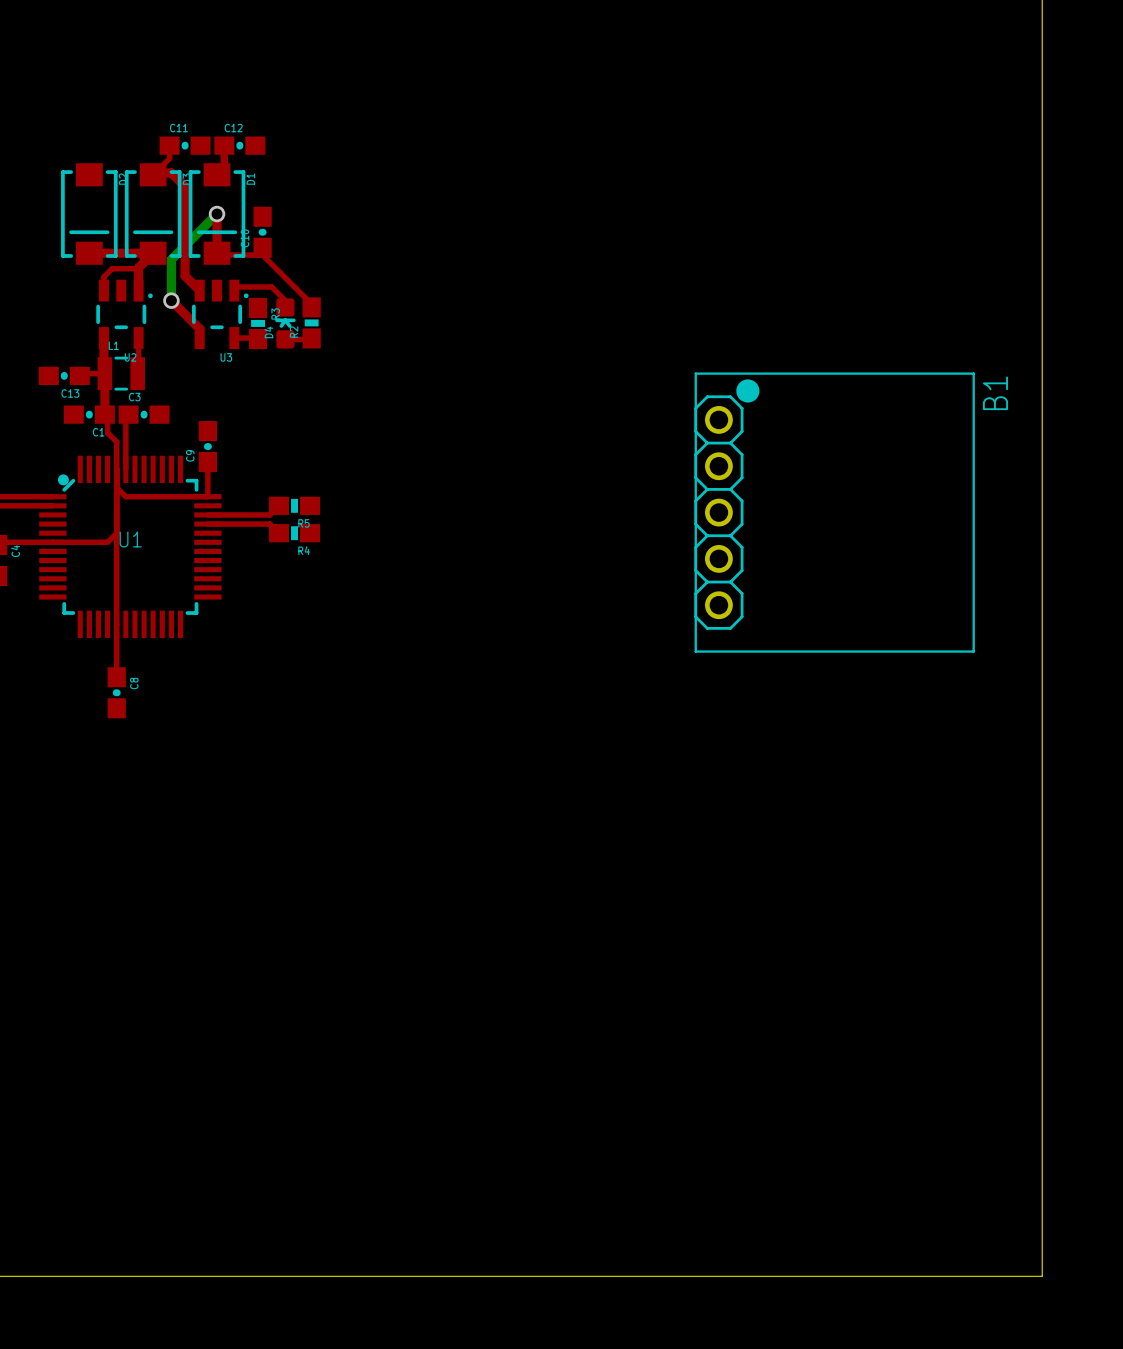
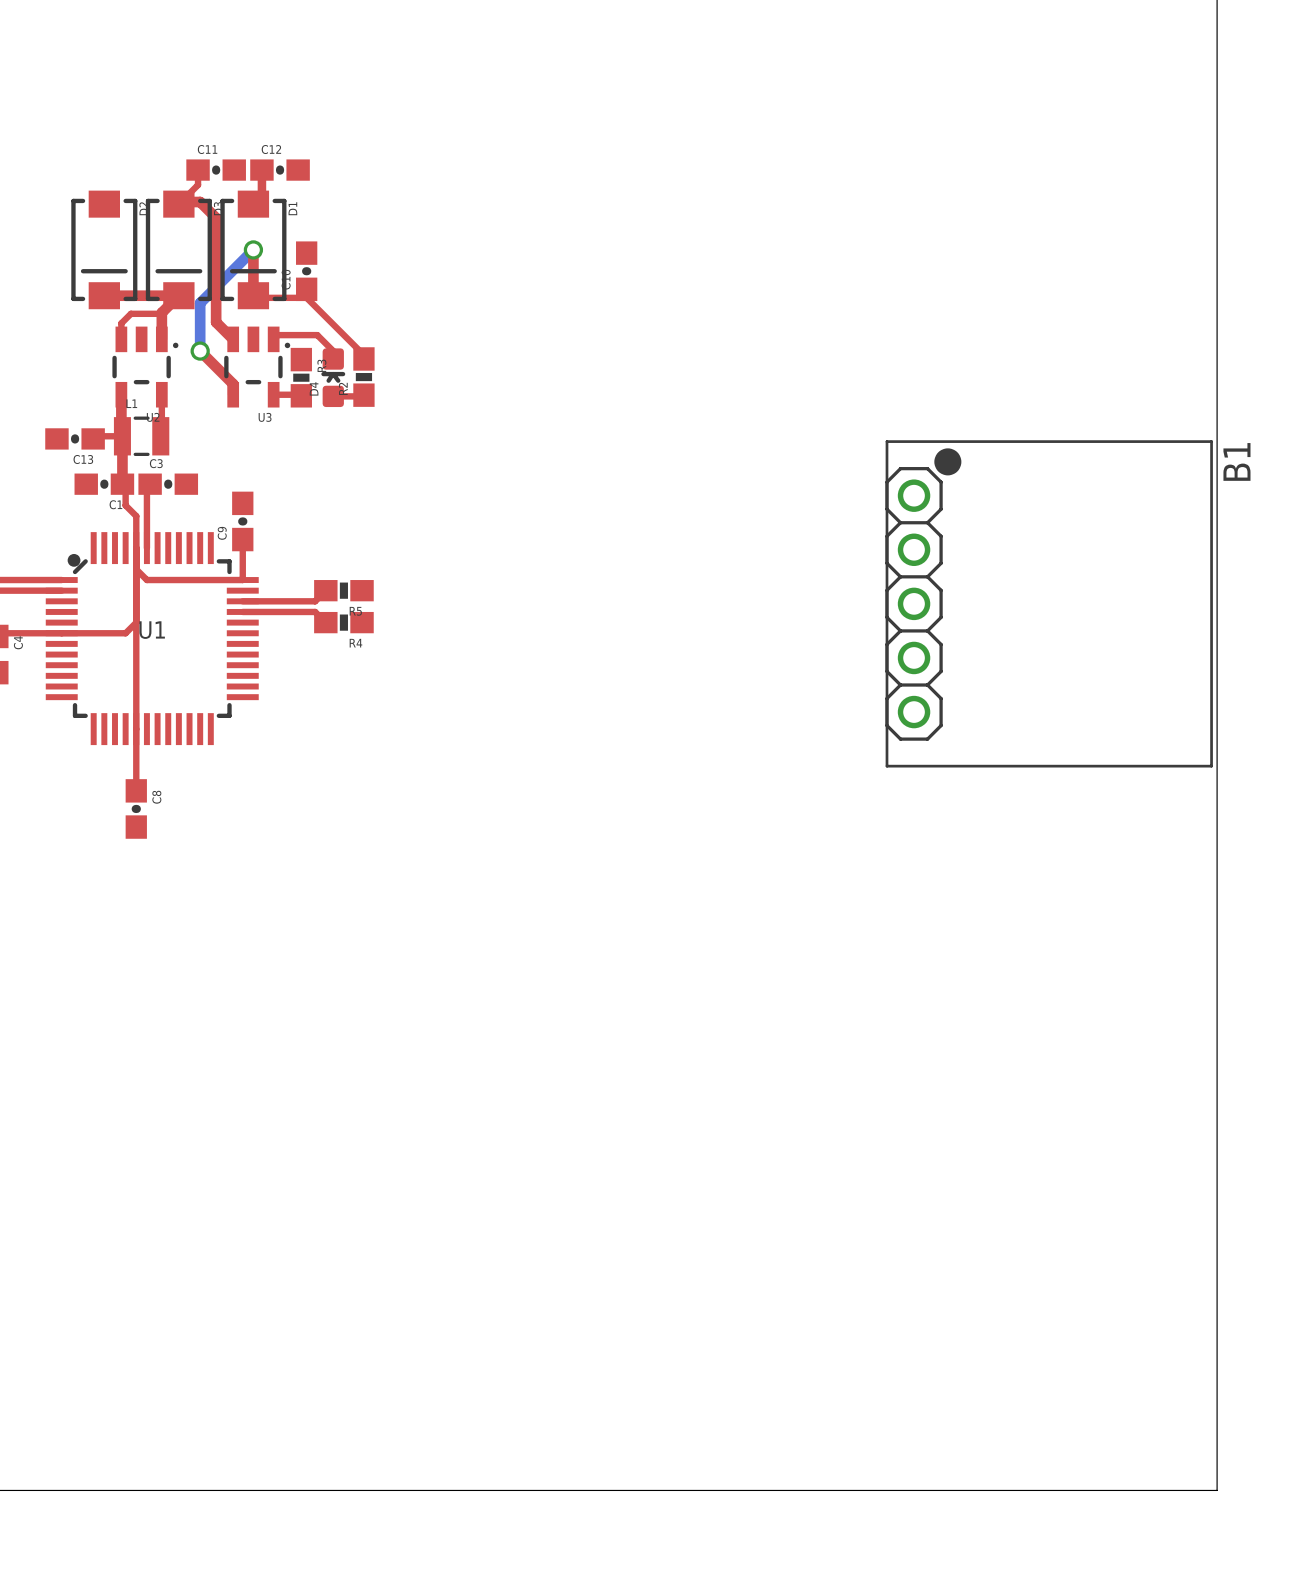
B1 position: (834, 512) -> (1049, 603)

